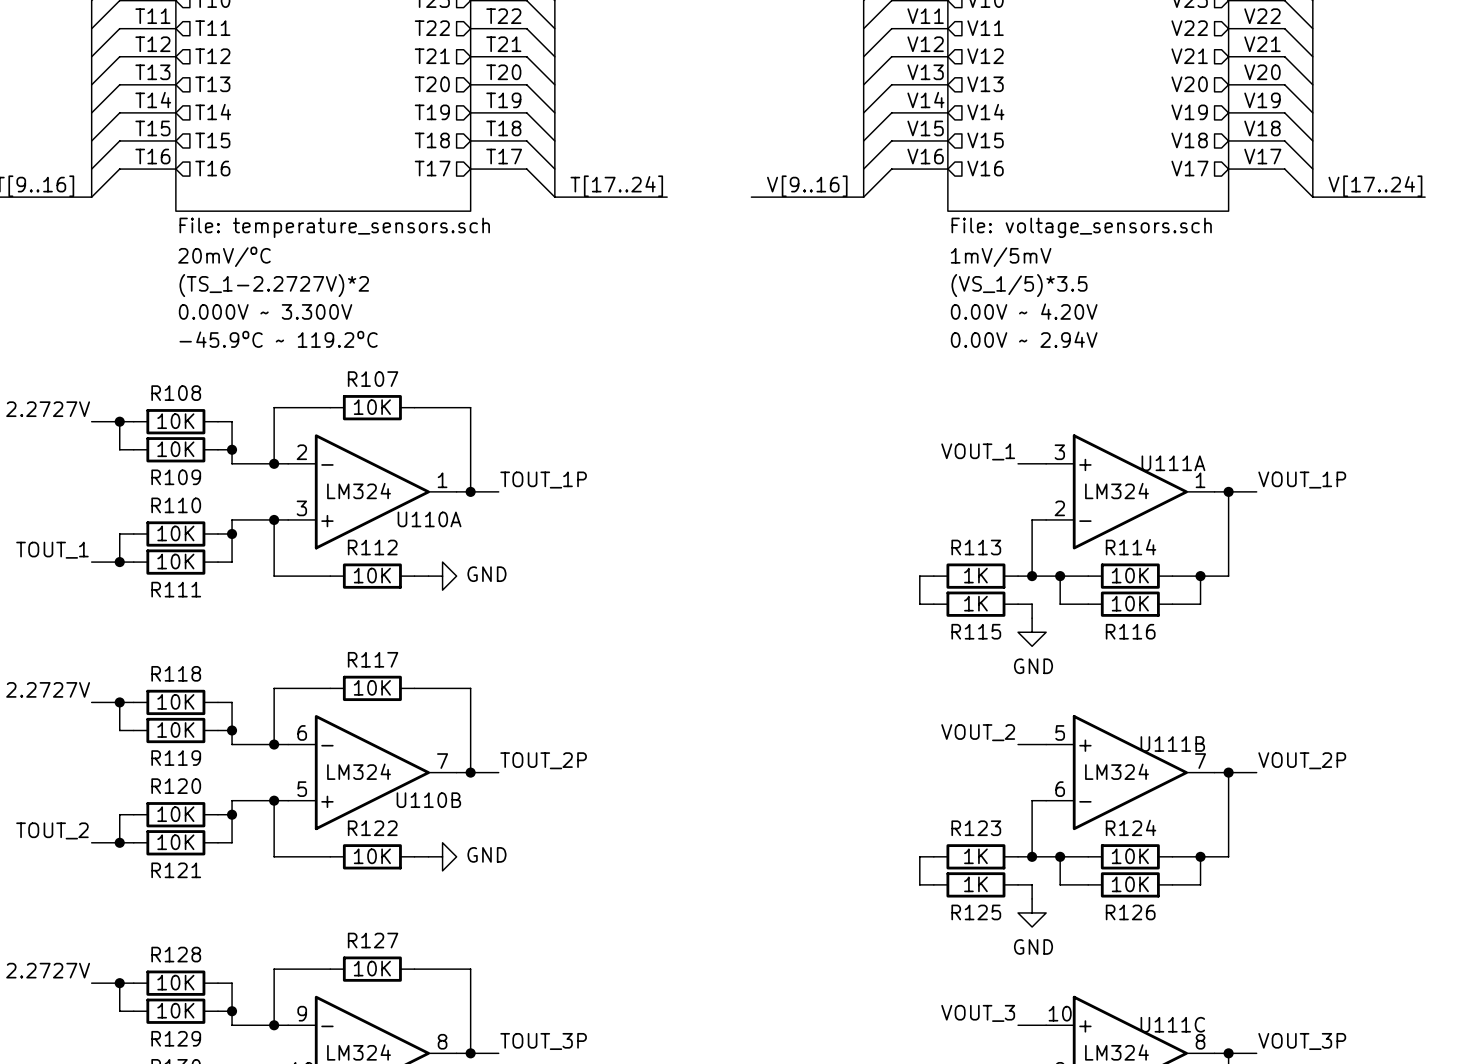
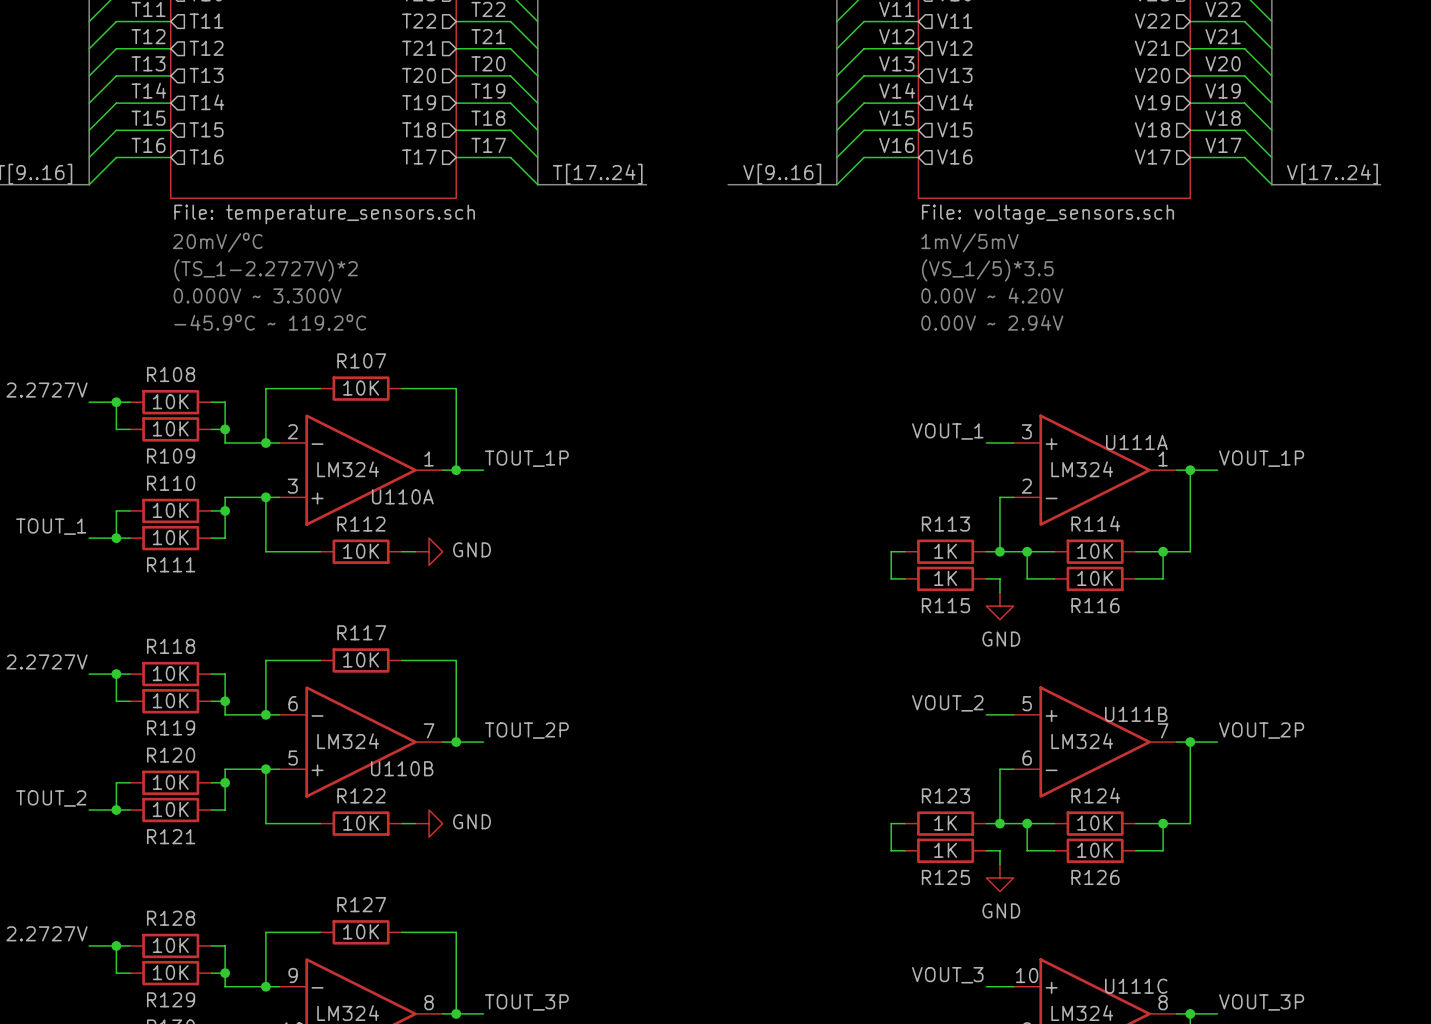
U110A name position: U110A (429, 519) -> U110A (402, 496)
U110B name position: U110B (428, 800) -> U110B (402, 768)

